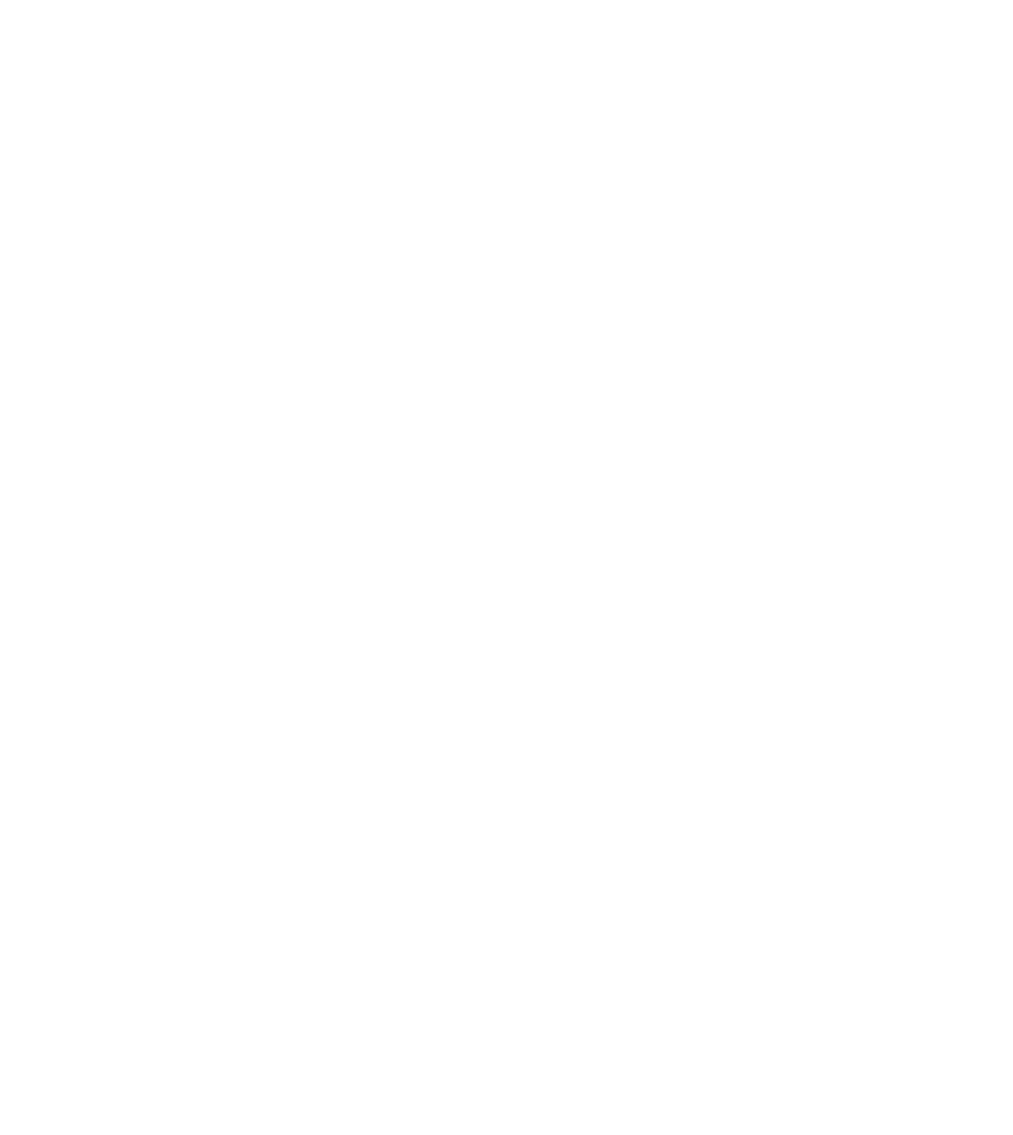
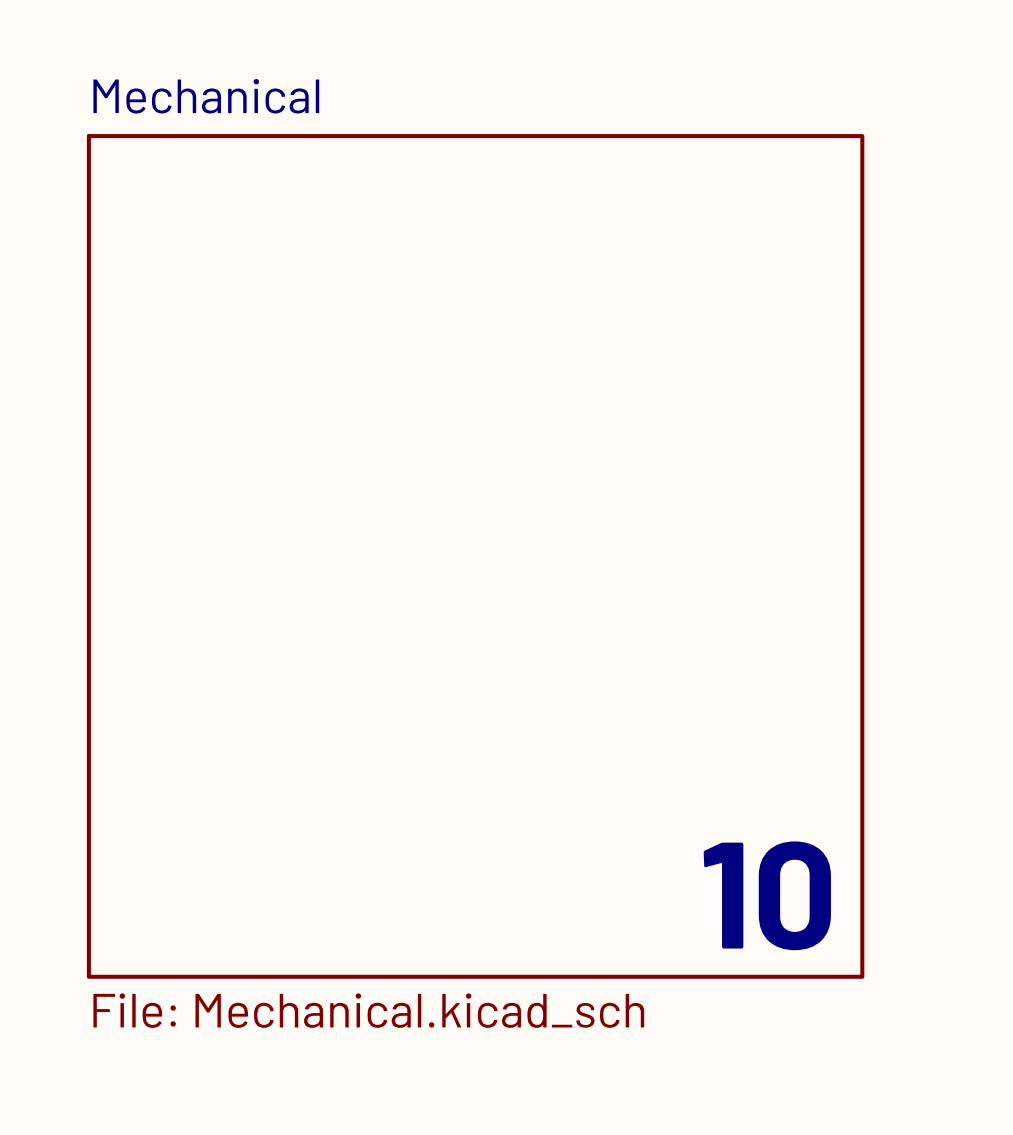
sheet Mechanical: none -> File: Mechanical.kicad_sch (475, 556)
text: none -> 10 (767, 895)

